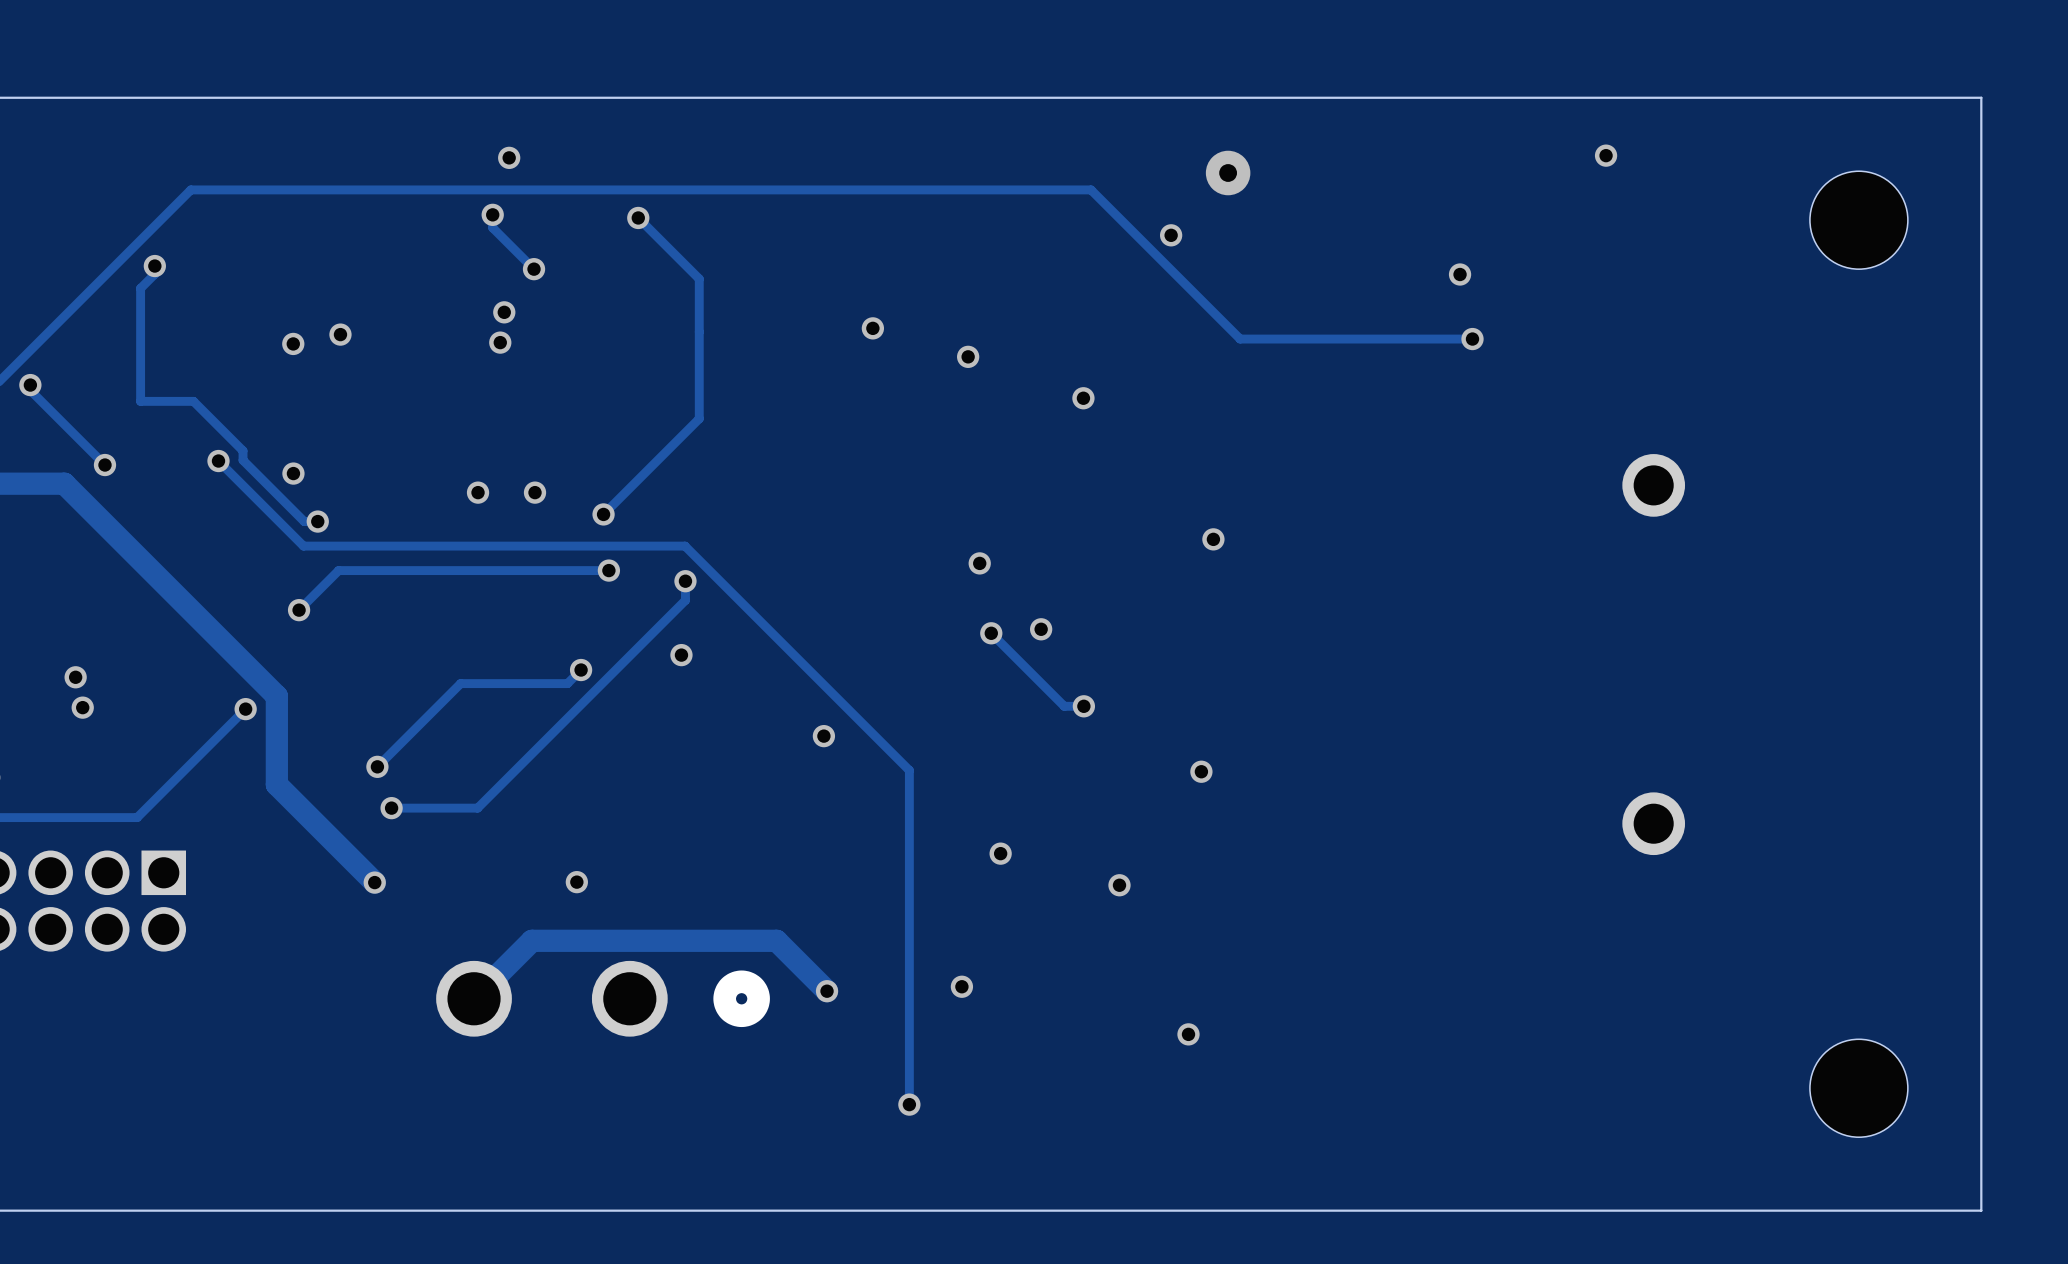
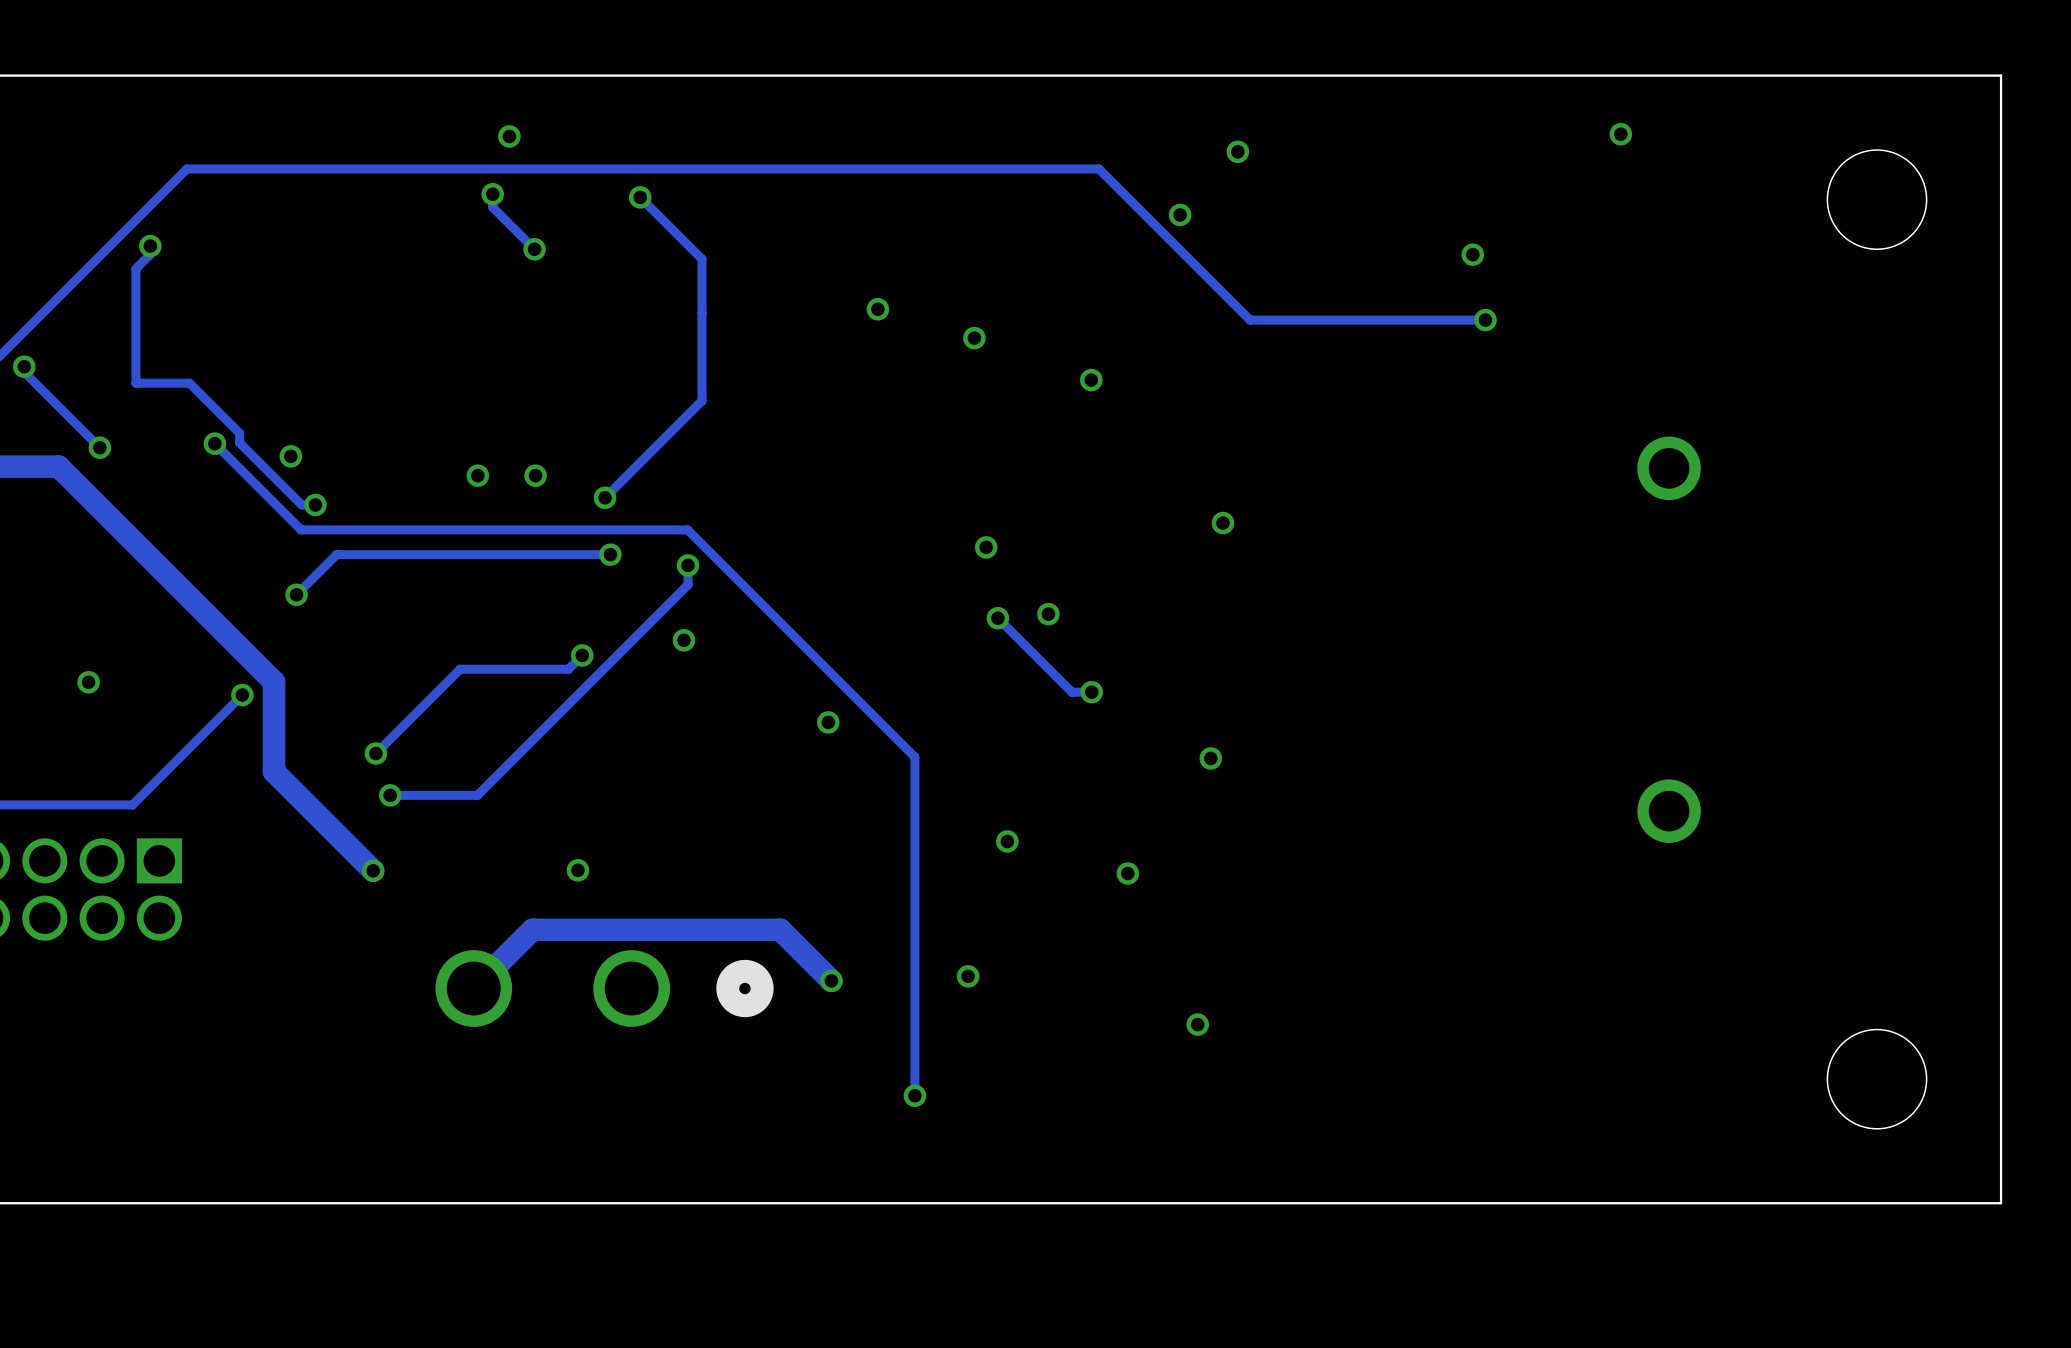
via size: [1205, 150, 1251, 196] -> [1226, 140, 1250, 164]
via: (504, 312) -> none
via: (340, 334) -> none
via: (500, 342) -> none
via: (293, 343) -> none
via: (75, 677) -> none
via: none -> (88, 682)
via: (82, 707) -> none

